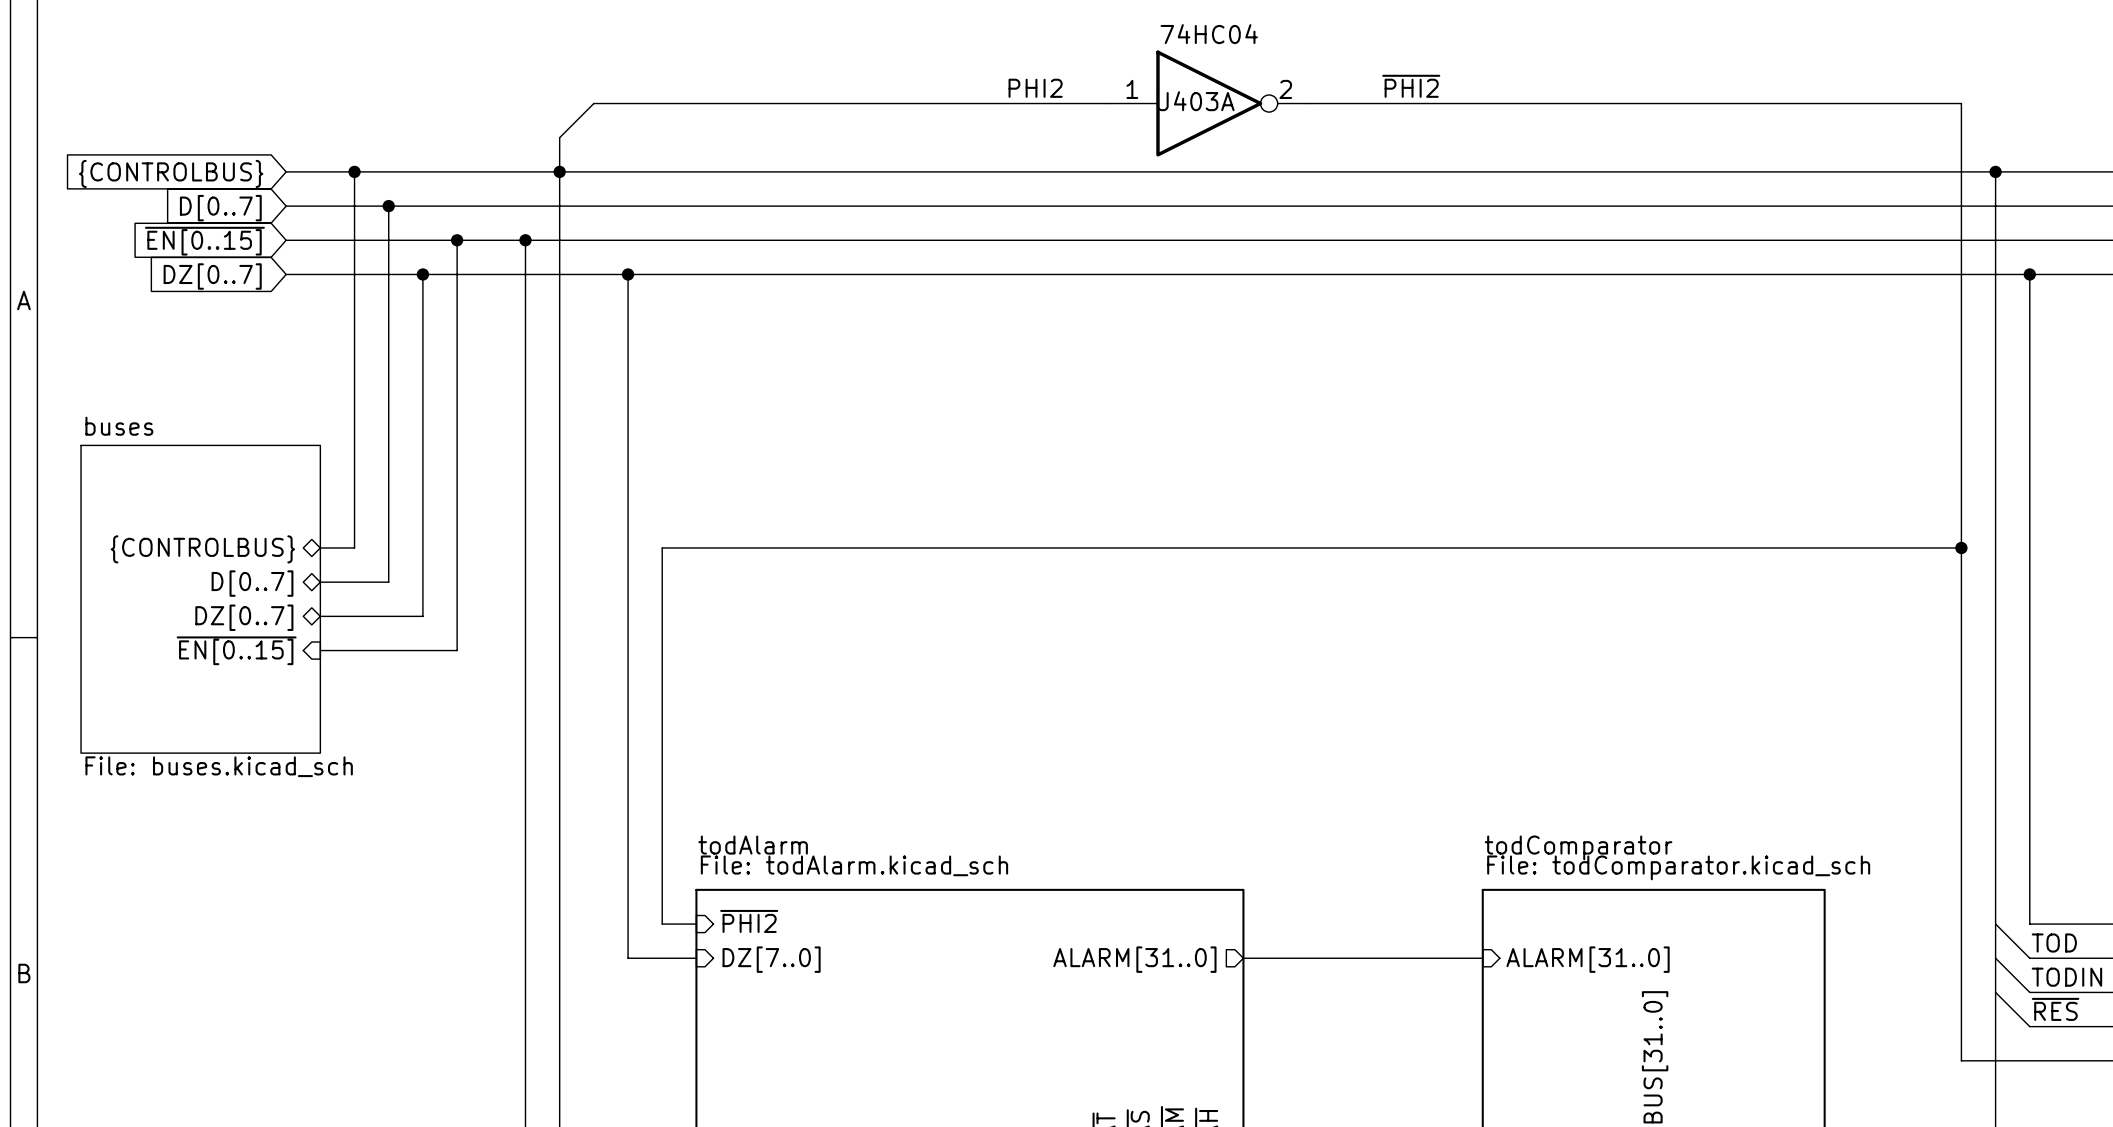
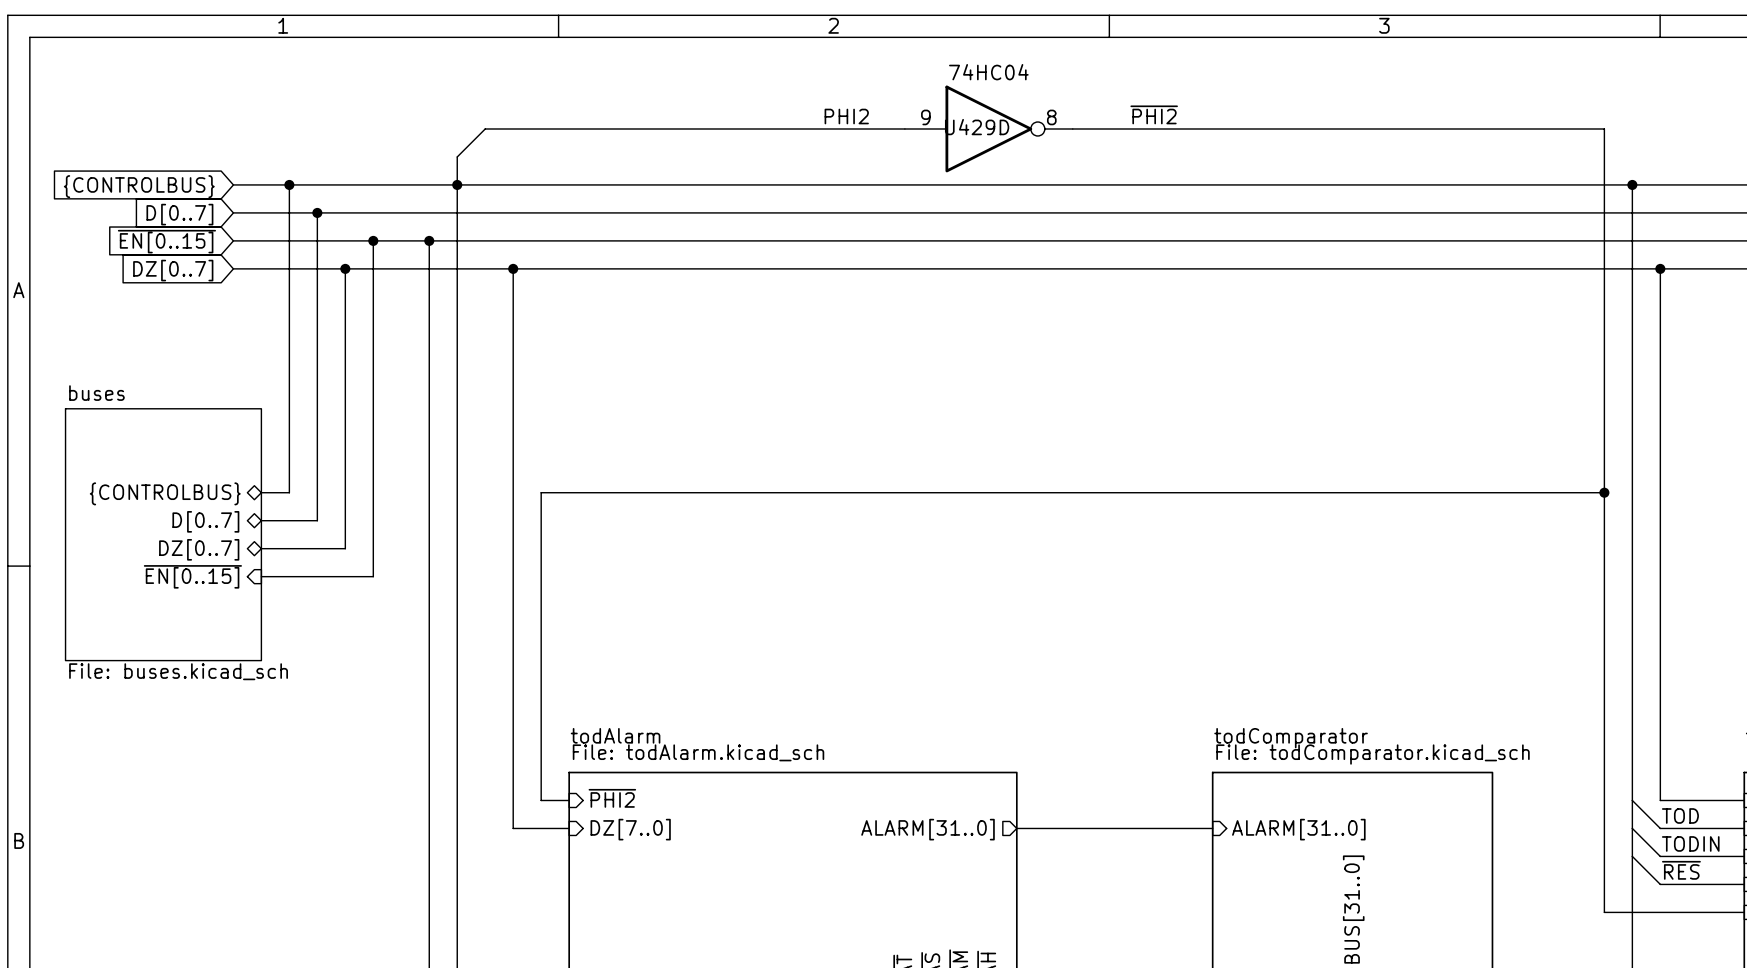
U403A pin number: 1 (1132, 89) -> 9 (925, 117)
U403A pin number: 2 (1285, 89) -> 8 (1051, 117)
U403A name: U403A (1195, 101) -> U429D (977, 127)

